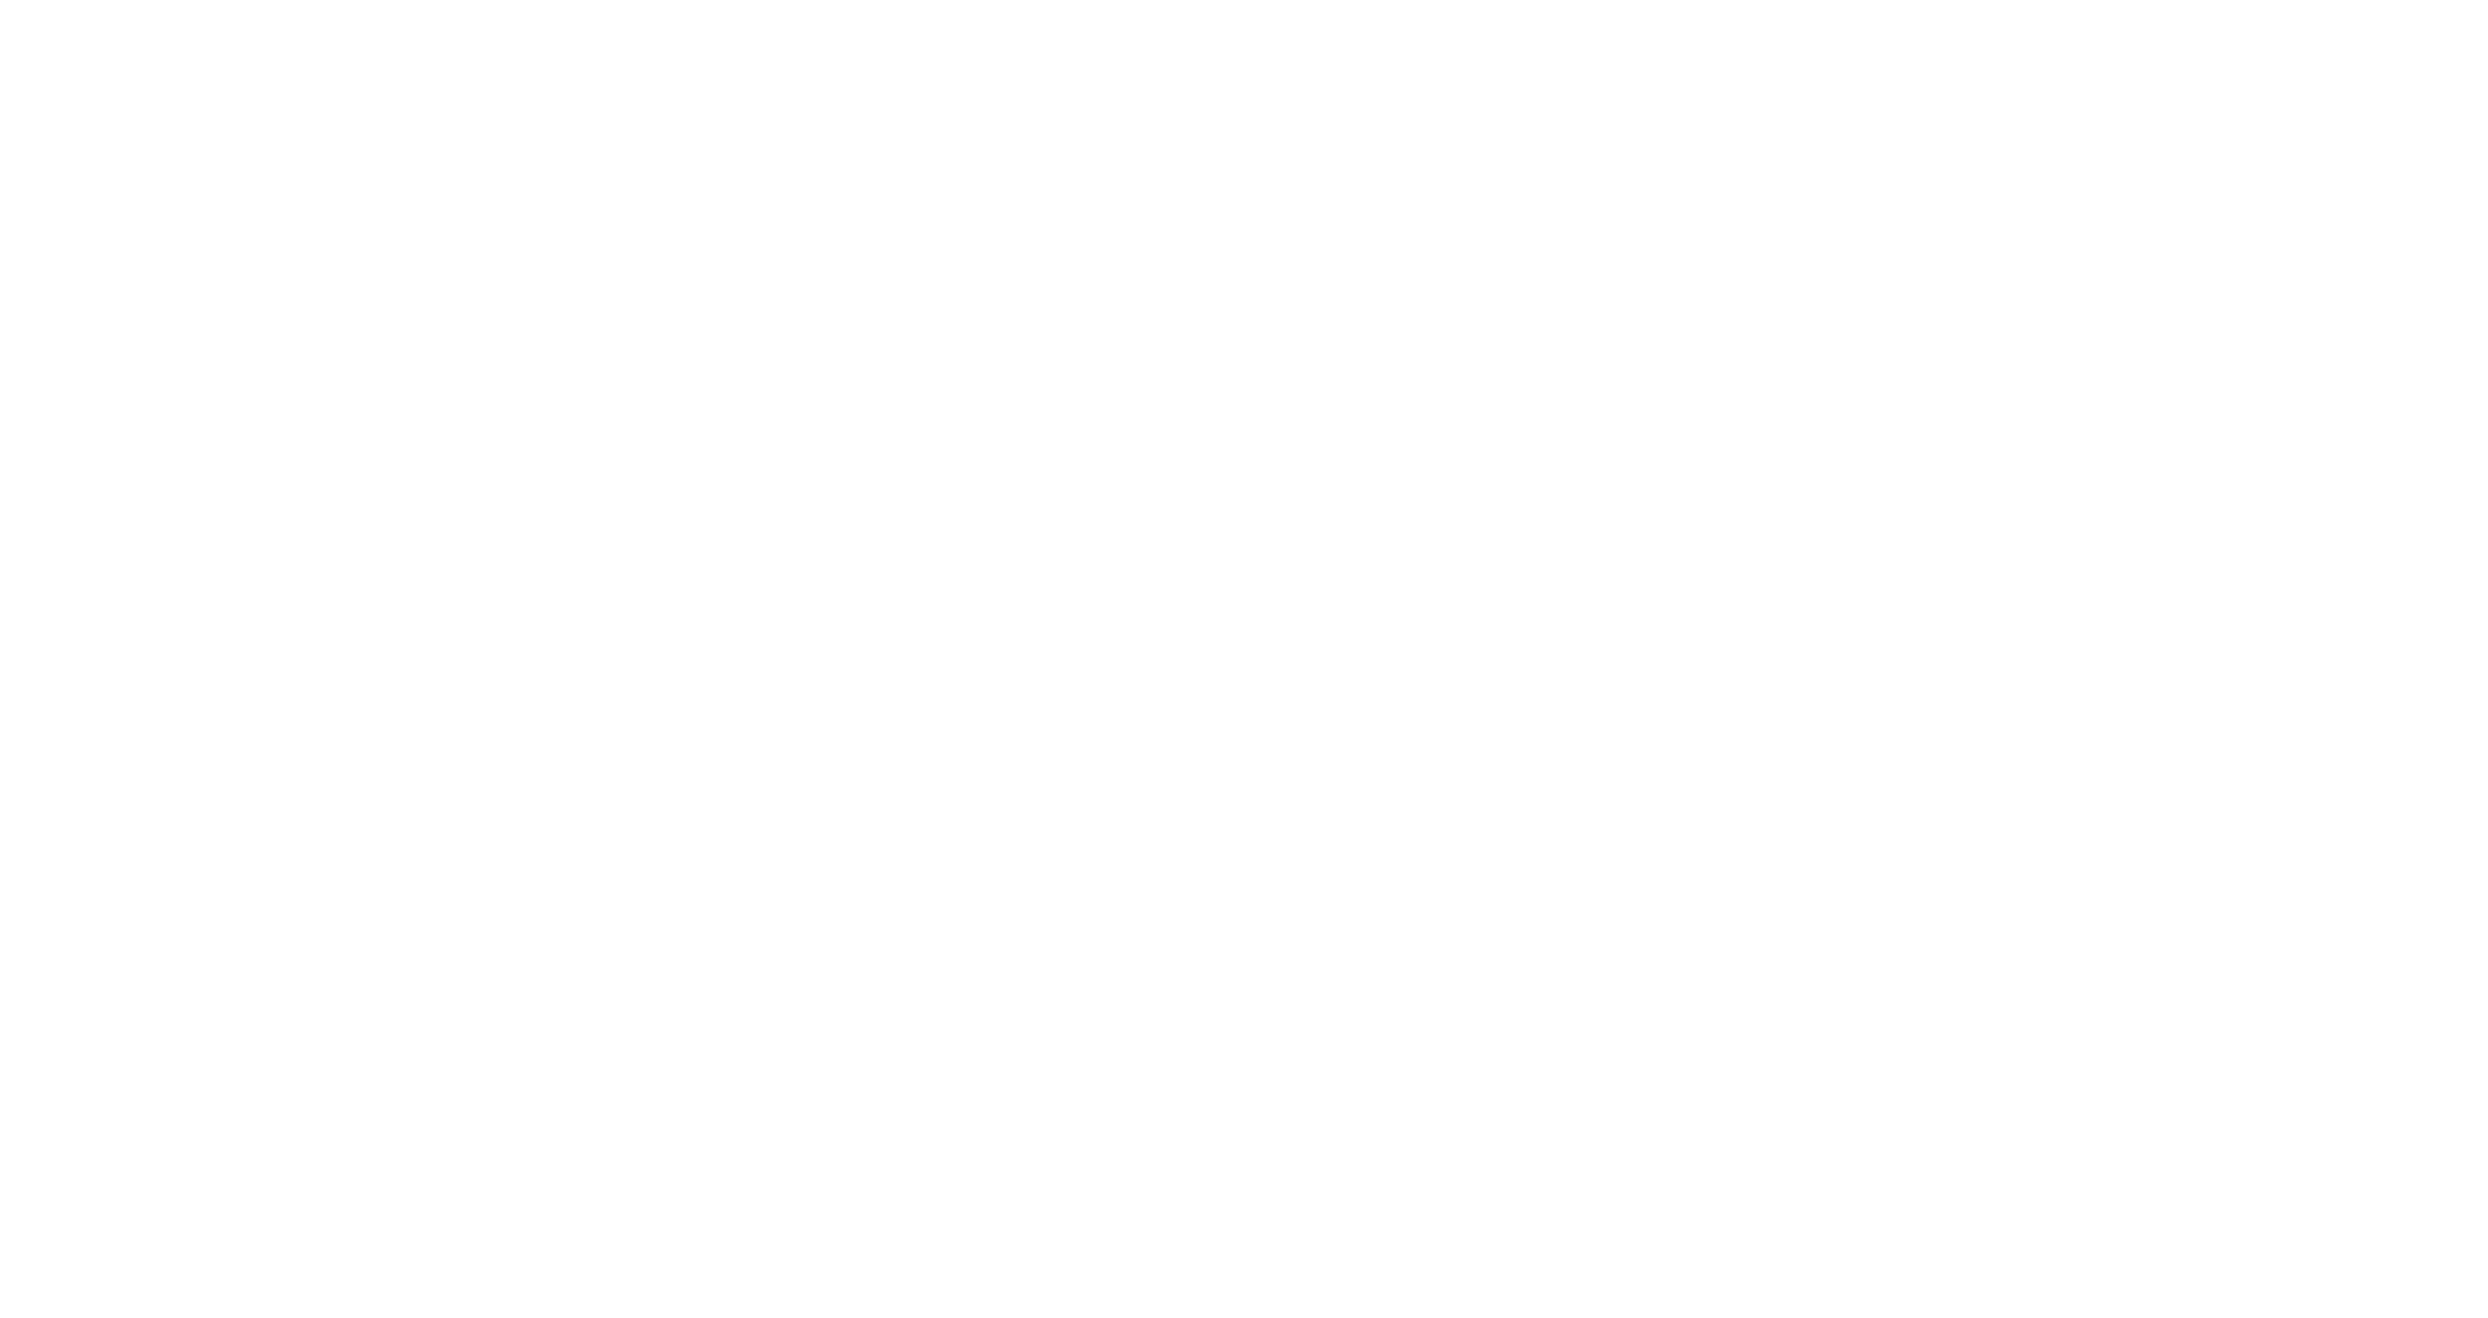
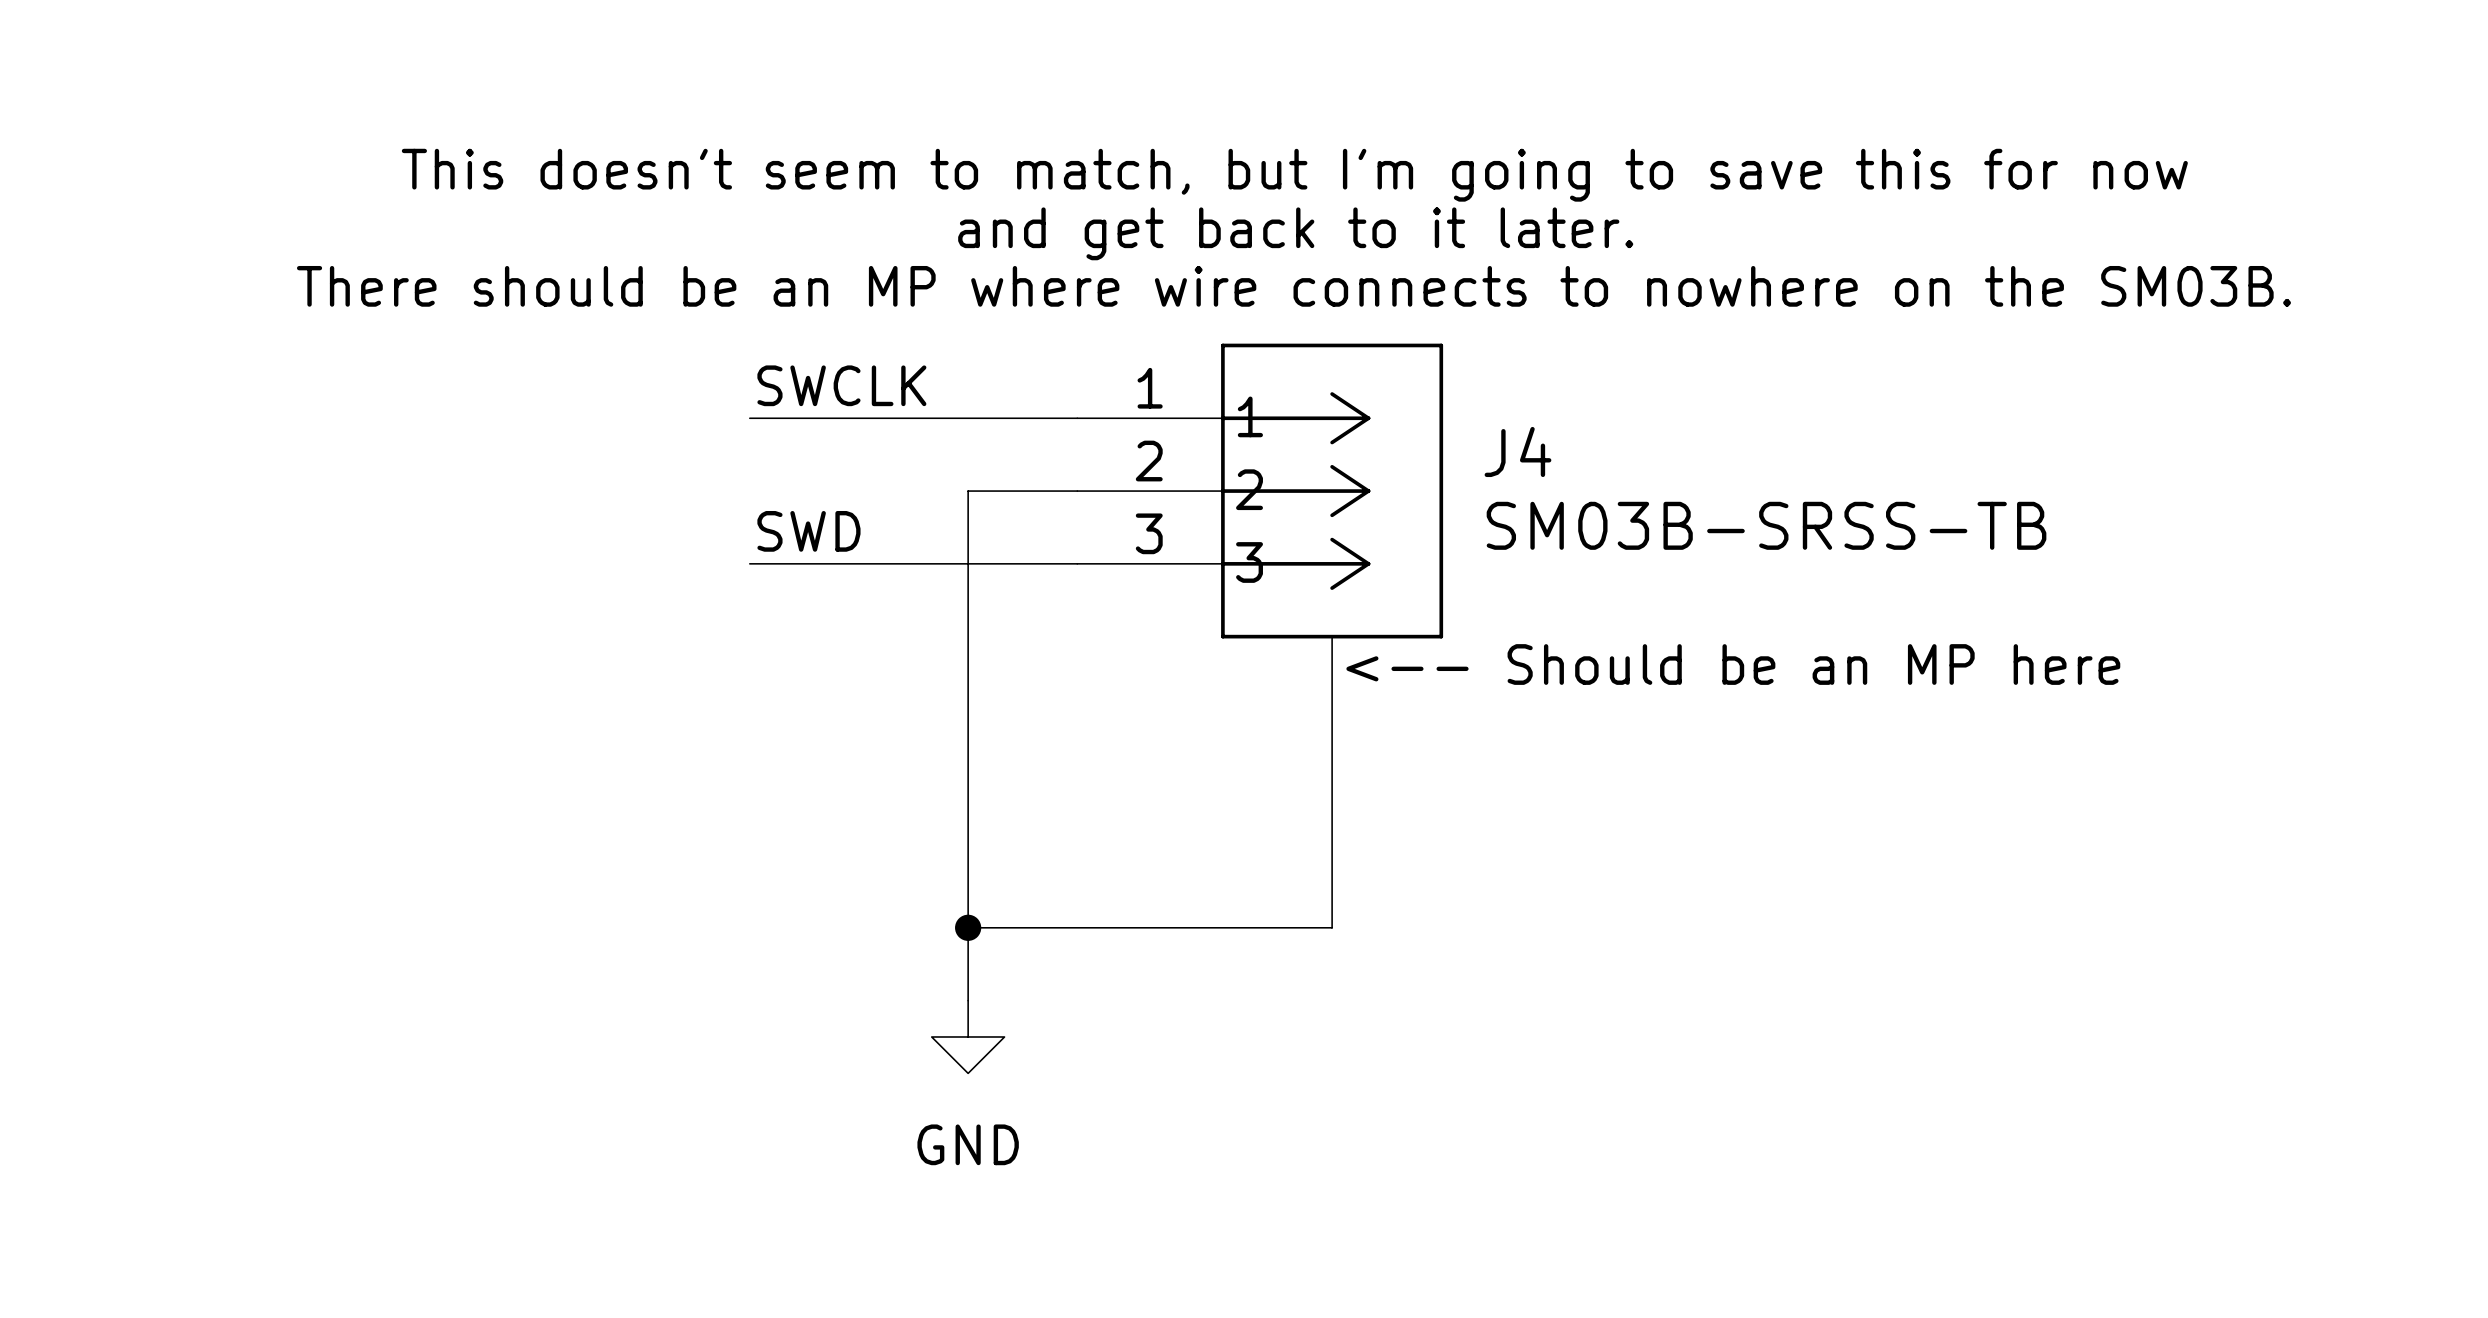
text: none -> This doesn't seem to match, but I'm going to save this for now (1294, 175)
text: none -> and get back to it later. (1295, 233)
text: none -> There should be an MP where wire connects to nowhere on the SM03B. (1293, 286)
label: none -> SWCLK (841, 385)
wire: none -> (749, 418) (1077, 418)
wire: none -> (1077, 491) (968, 491) (968, 1000)
J4: none -> SM03B-SRSS-TB (1260, 491)
label: none -> SWD (808, 531)
wire: none -> (749, 563) (1077, 563)
wire: none -> (1332, 636) (1332, 927) (968, 927)
text: none -> <-- Should be an MP here (1733, 664)
junction: none -> (968, 927)
power symbol: none -> GND (968, 1036)

